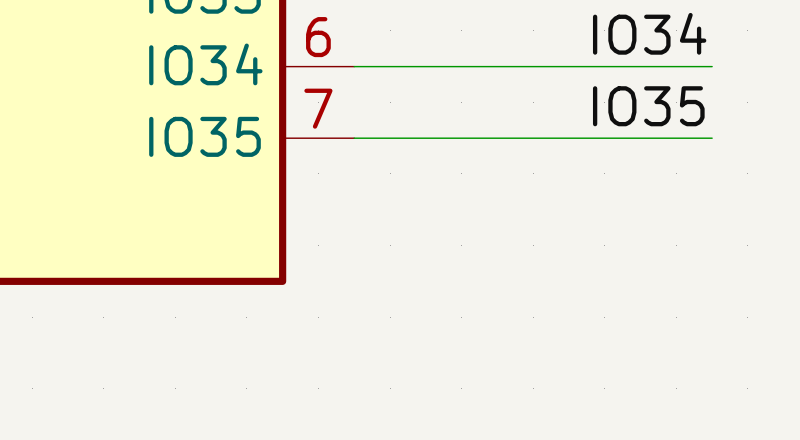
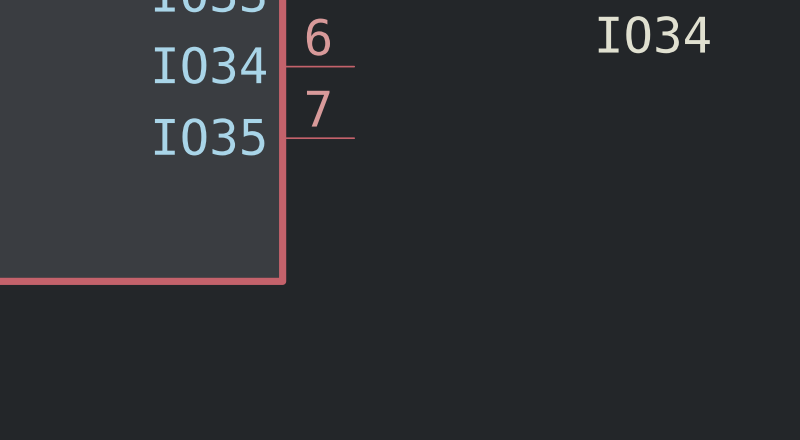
wire: (354, 66) (712, 66) -> none
label: IO35 (648, 106) -> none
wire: (354, 138) (712, 138) -> none

